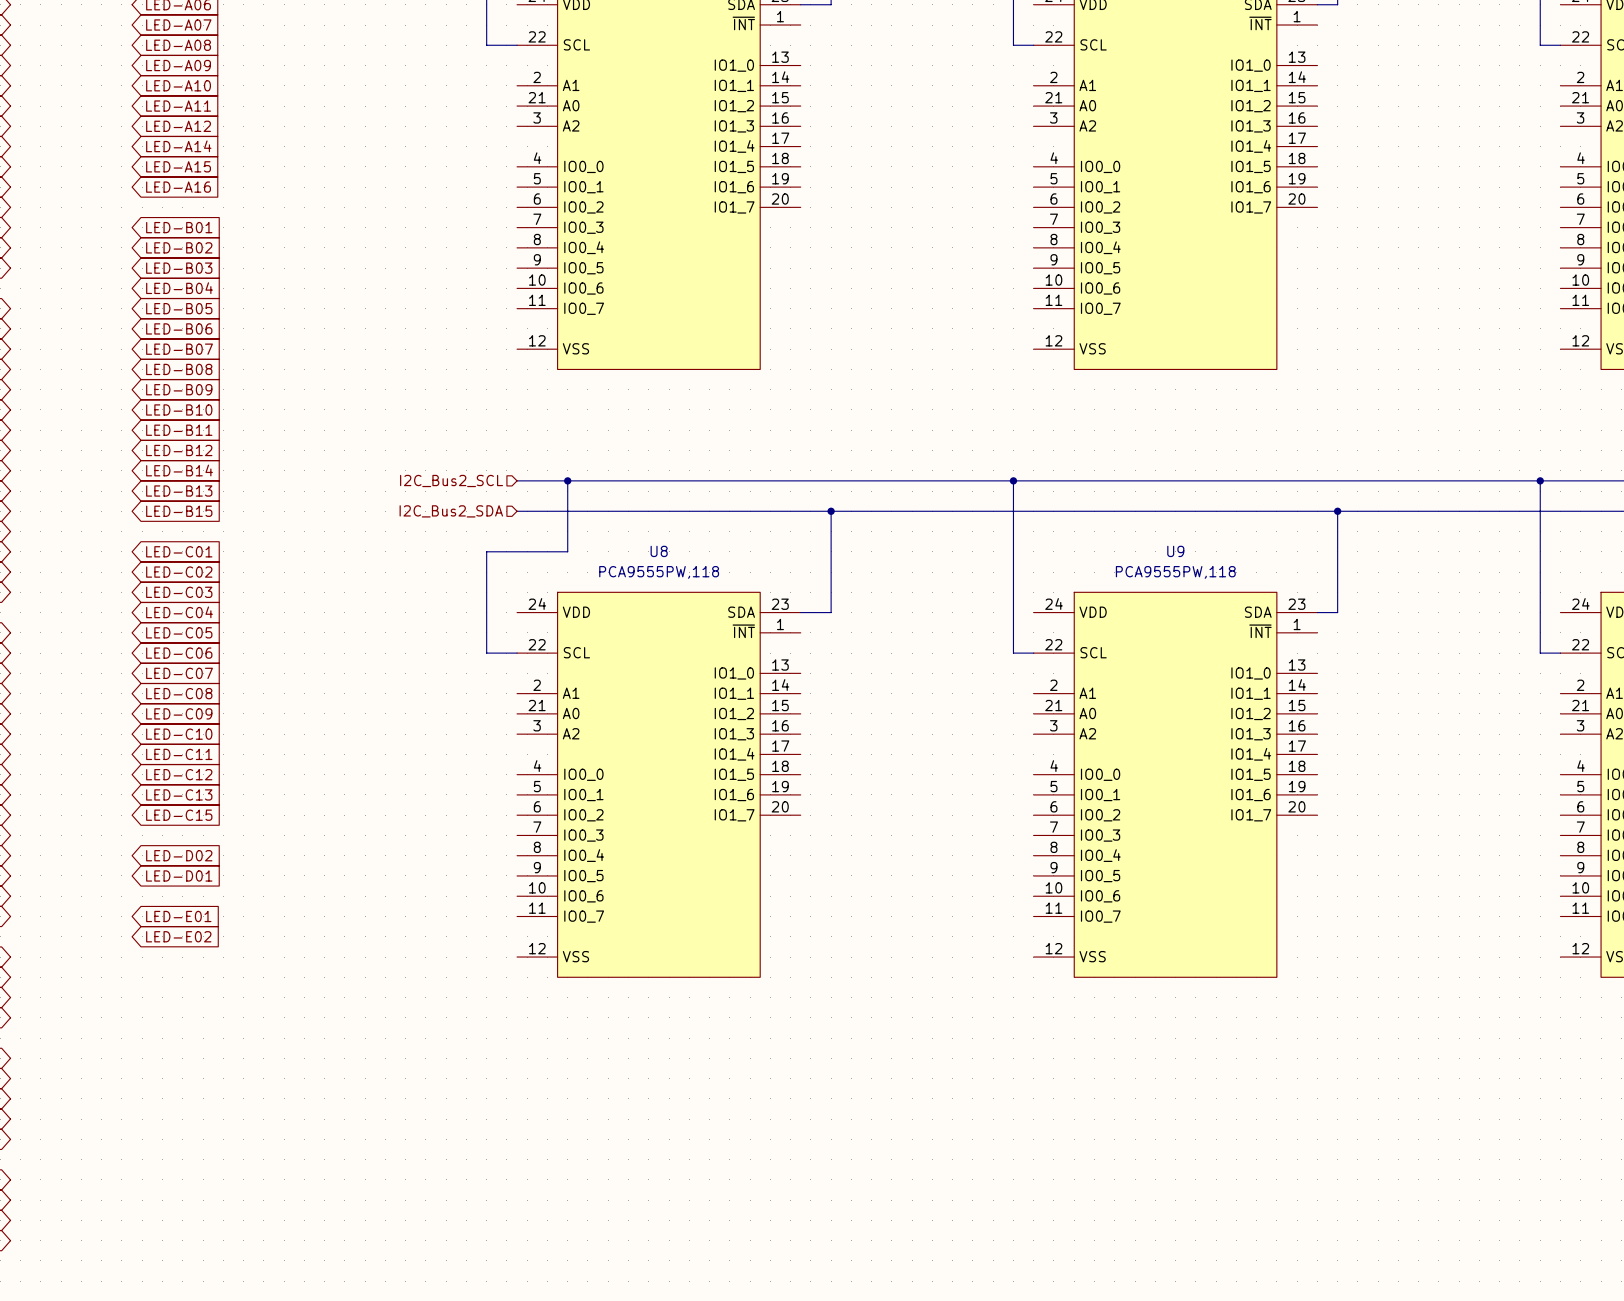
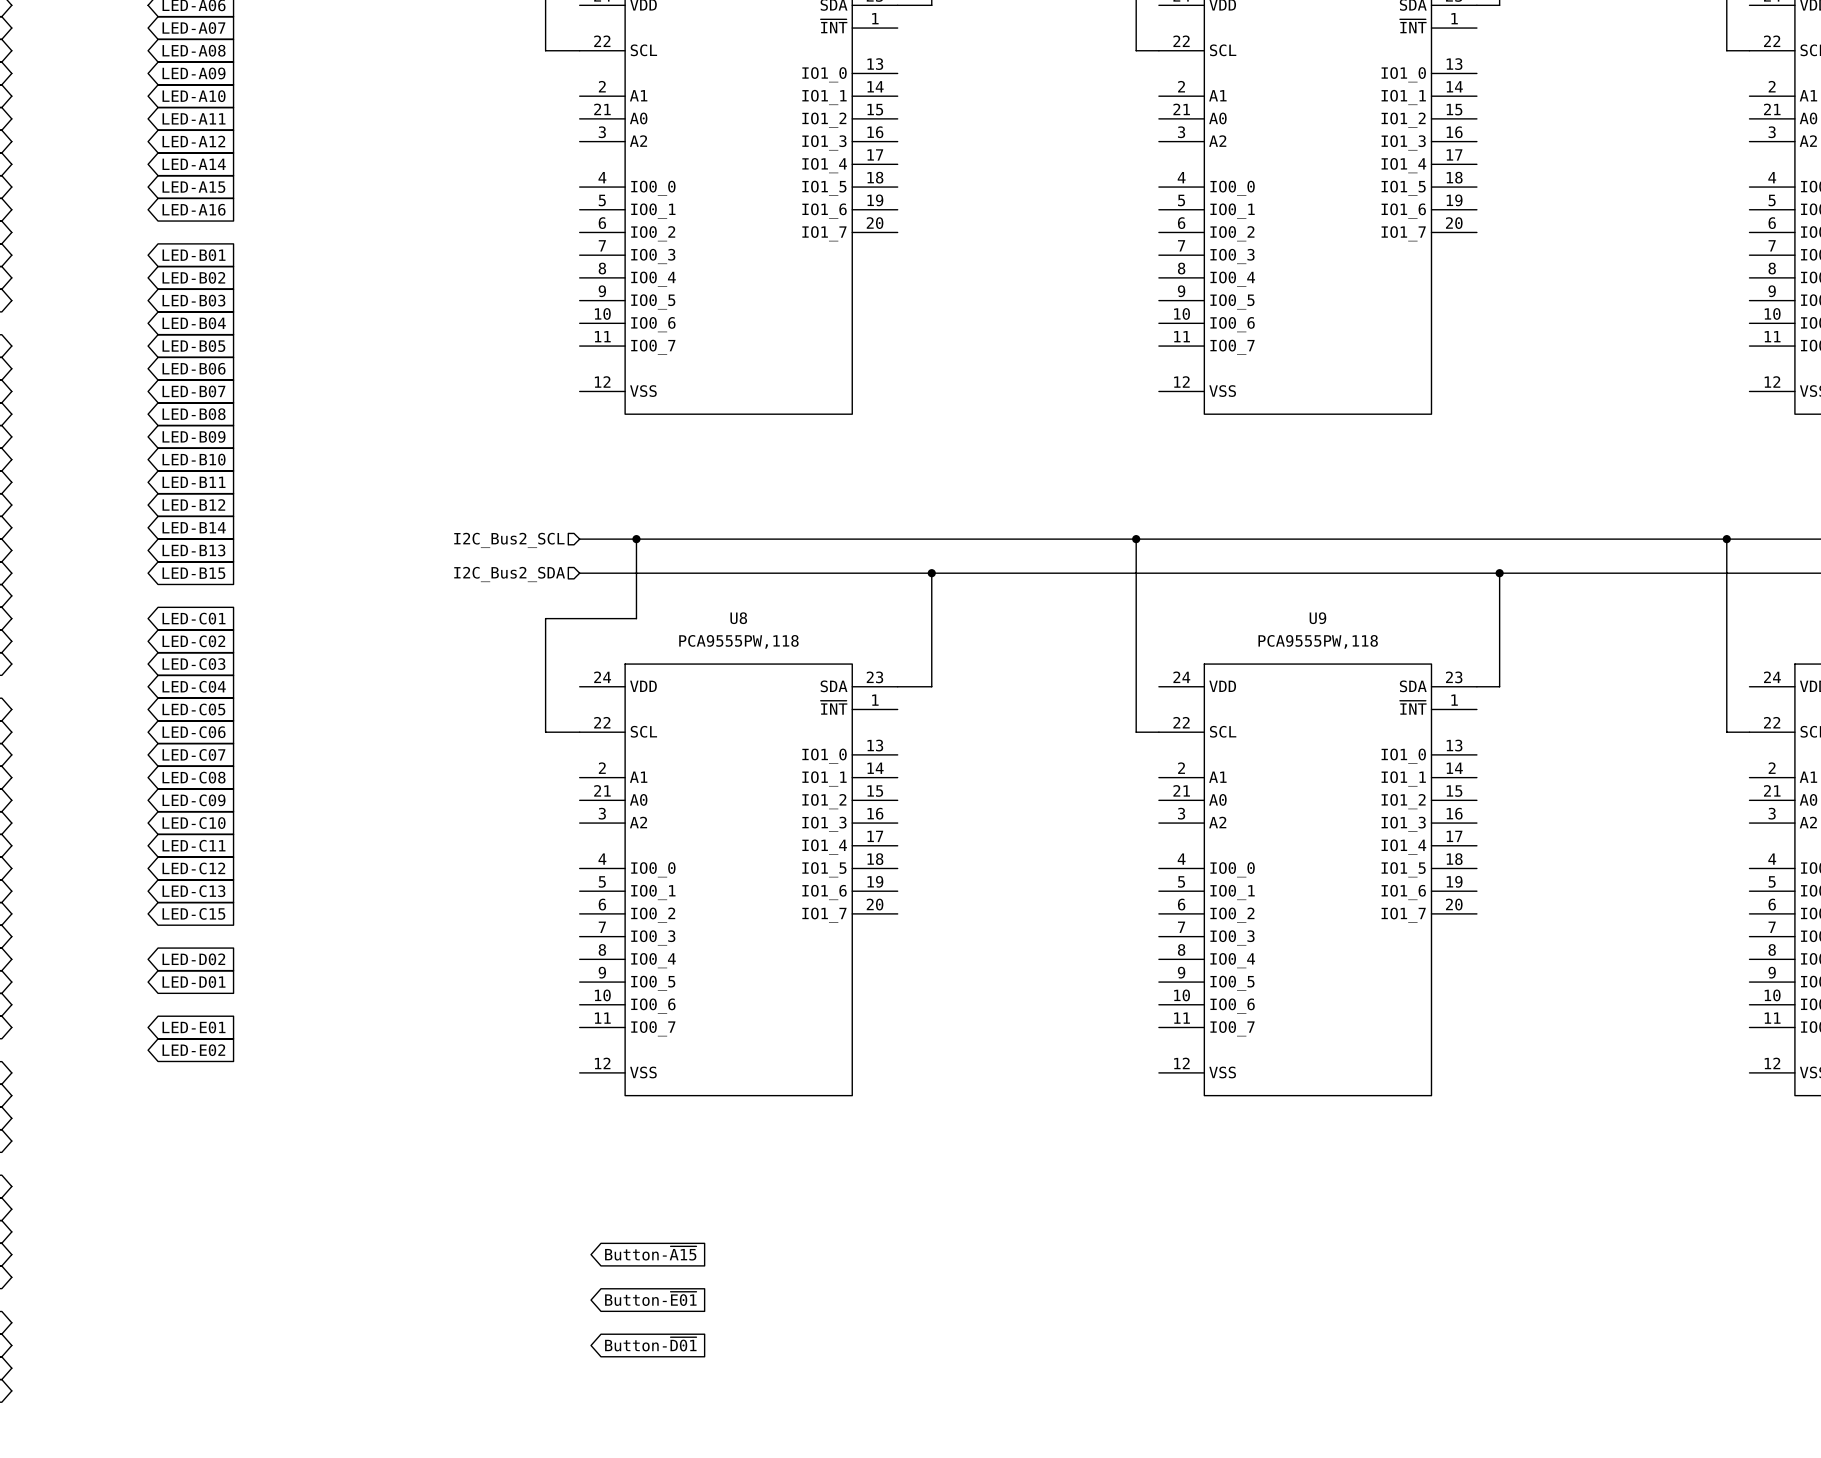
global label: none -> Button-~{A15} (650, 1253)
global label: none -> Button-~{E01} (650, 1298)
global label: none -> Button-~{D01} (650, 1344)

